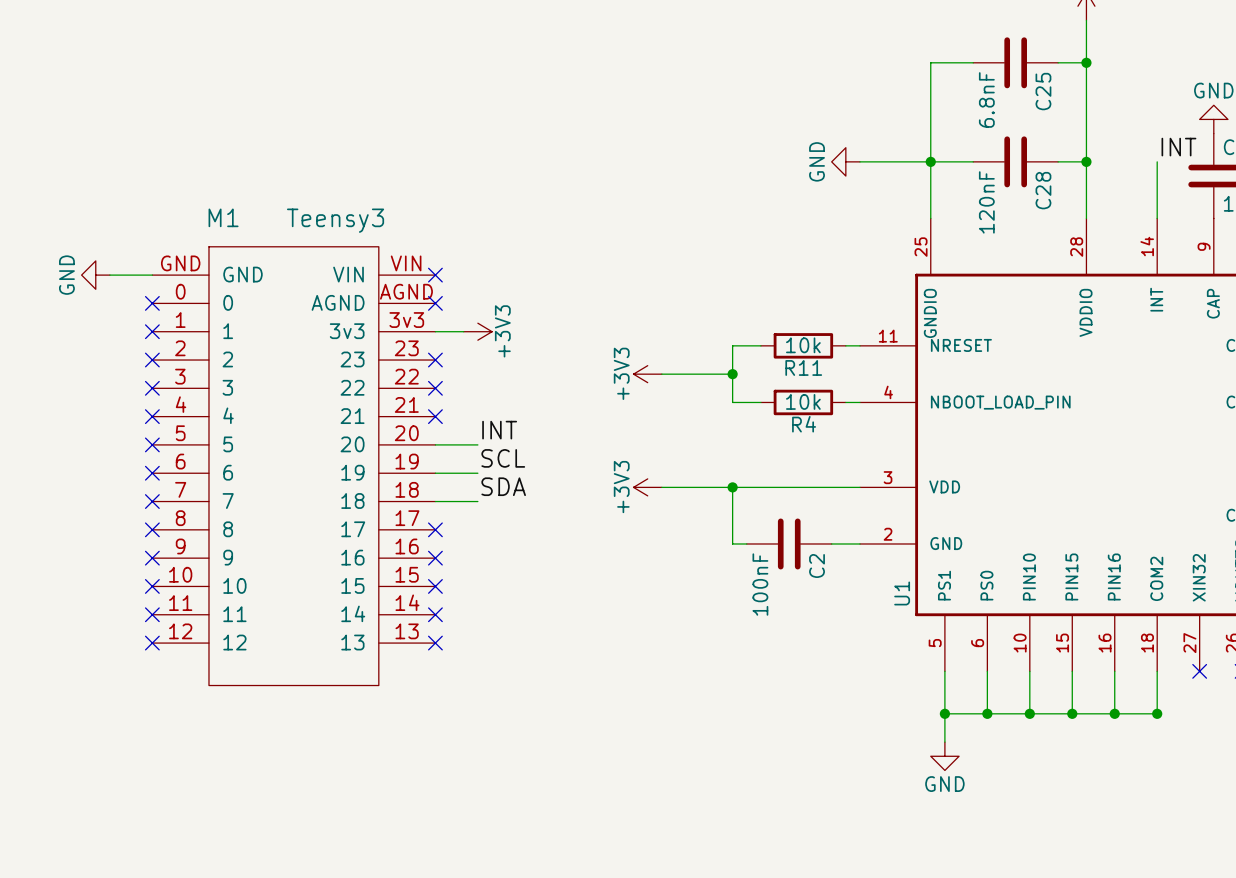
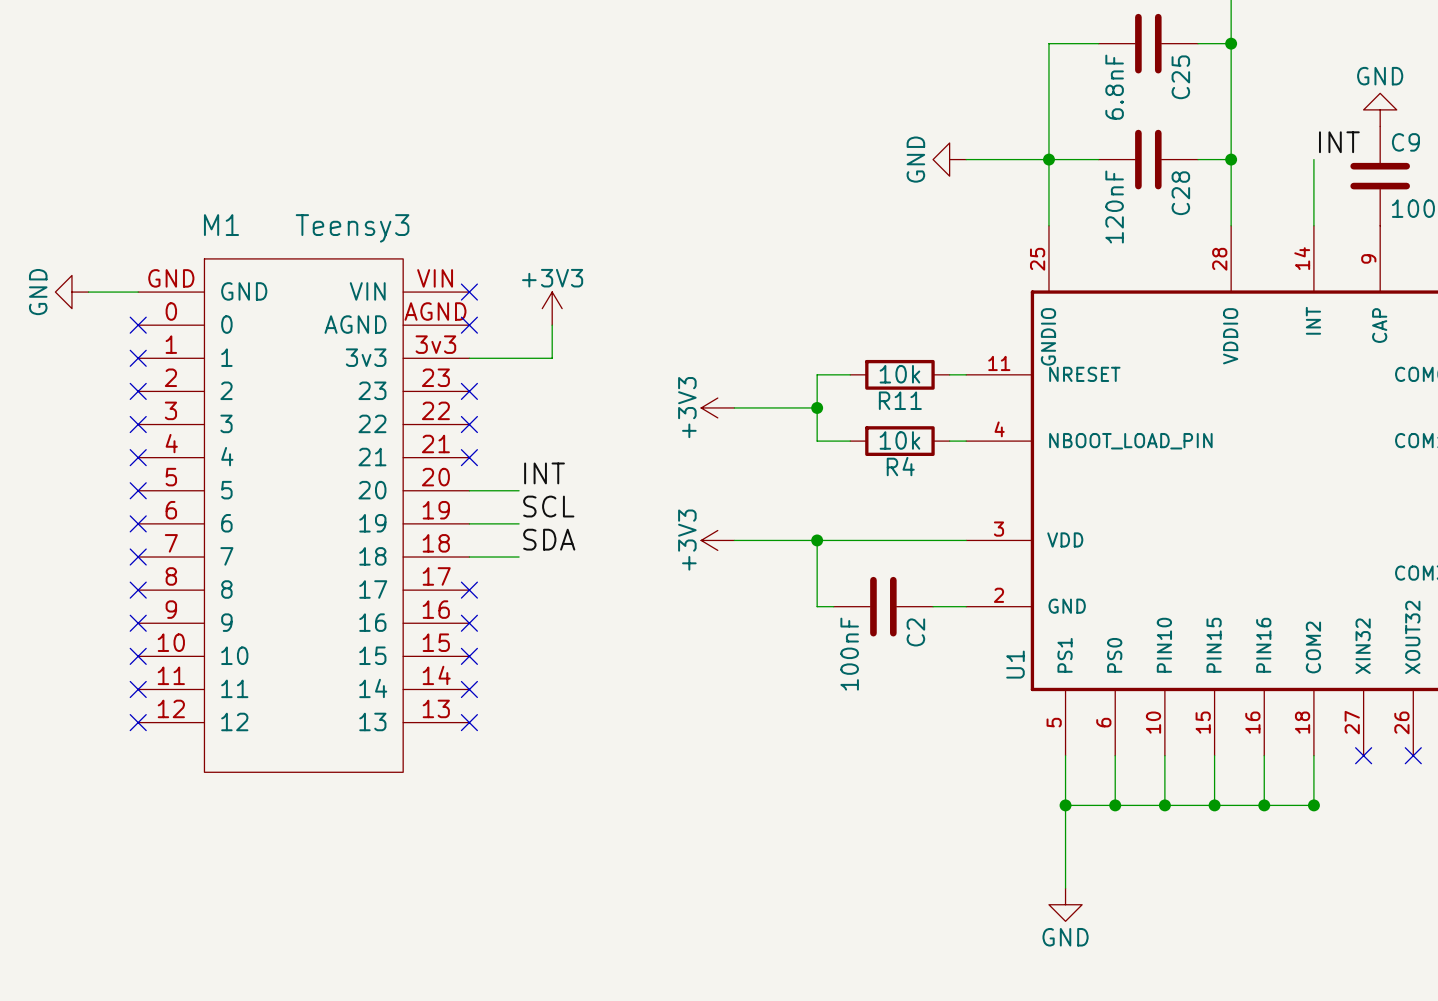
power symbol rotation: 0° (477, 331) -> 90° counterclockwise (552, 308)
power symbol position: +3V3 (477, 331) -> +3V3 (552, 308)
wire: none -> (1065, 838) (1065, 888)
power symbol position: GND (944, 756) -> GND (1065, 904)

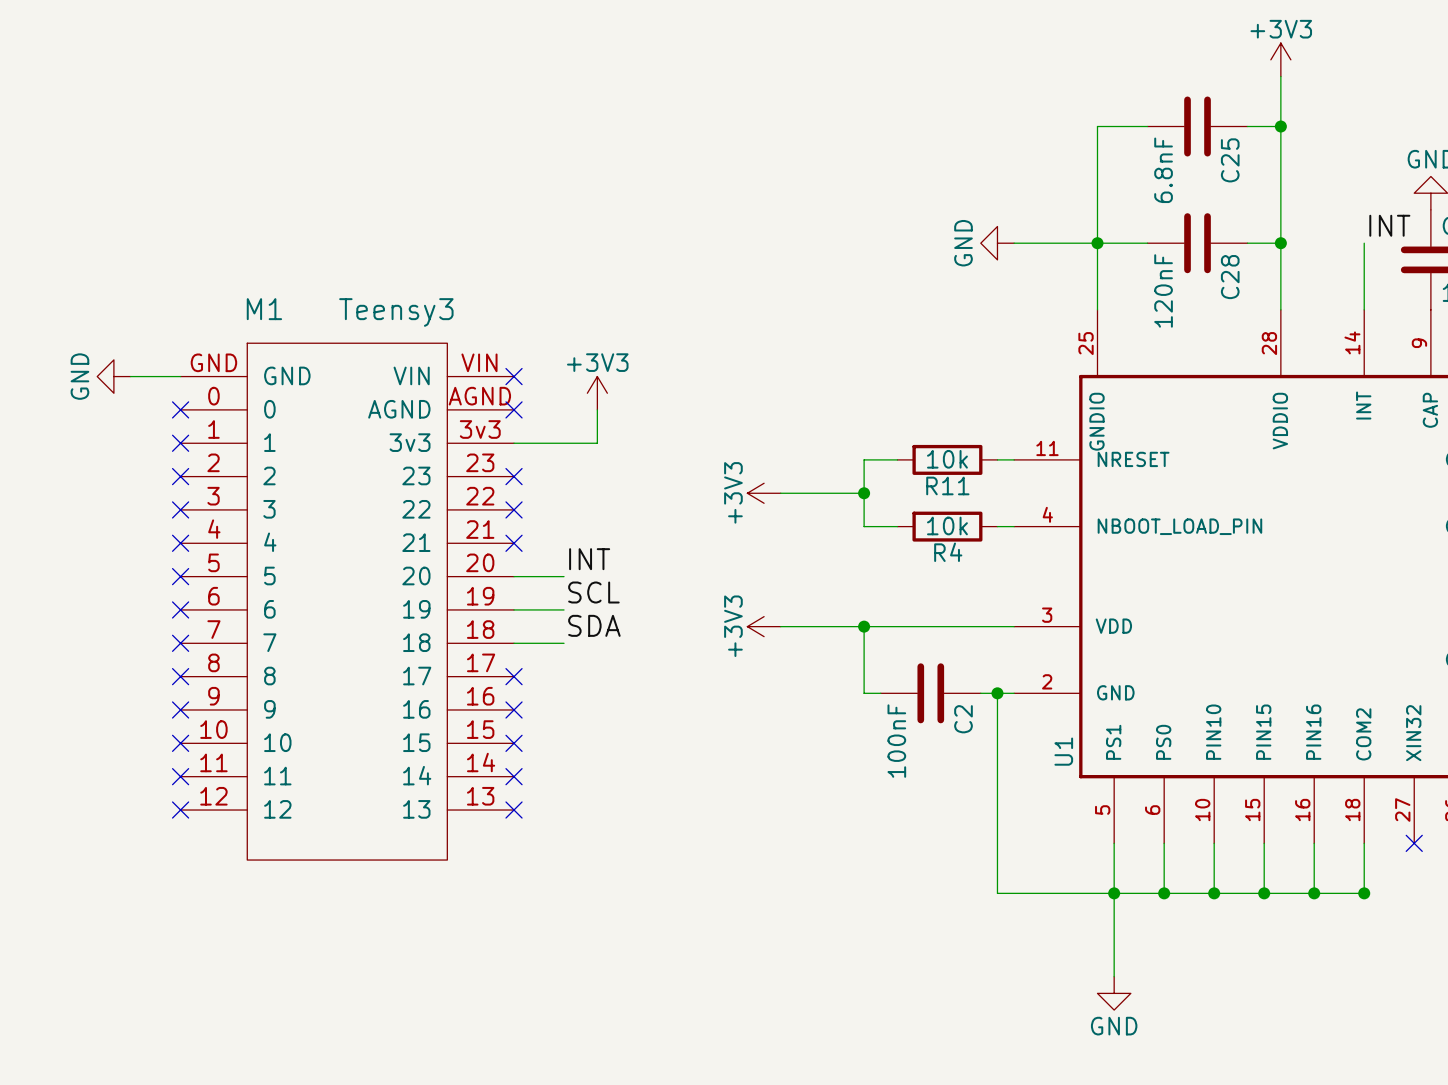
wire: none -> (997, 693) (997, 893) (1114, 893)
junction: none -> (997, 693)

